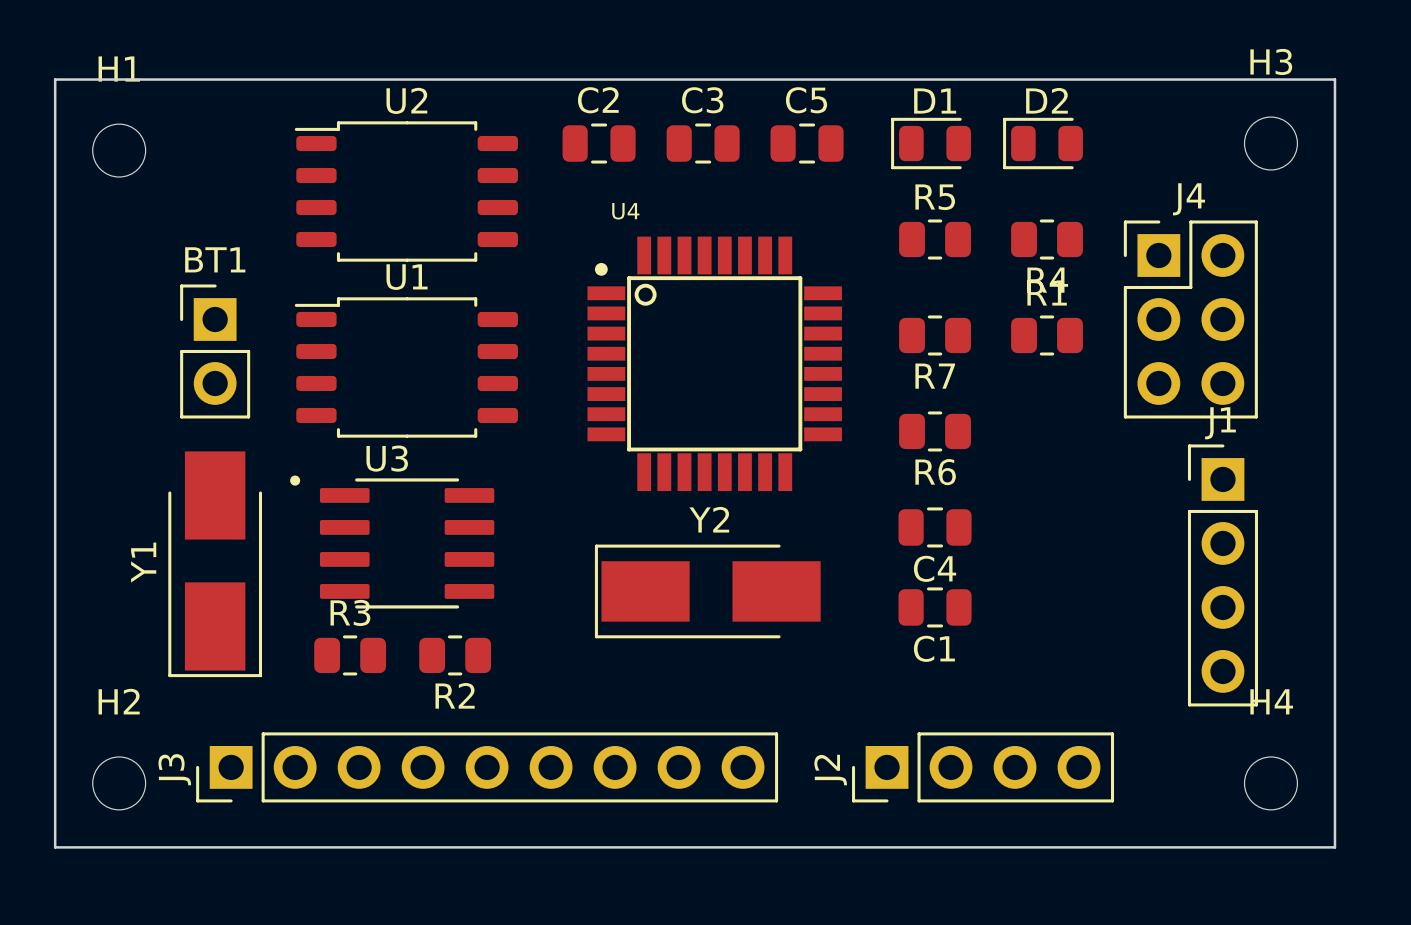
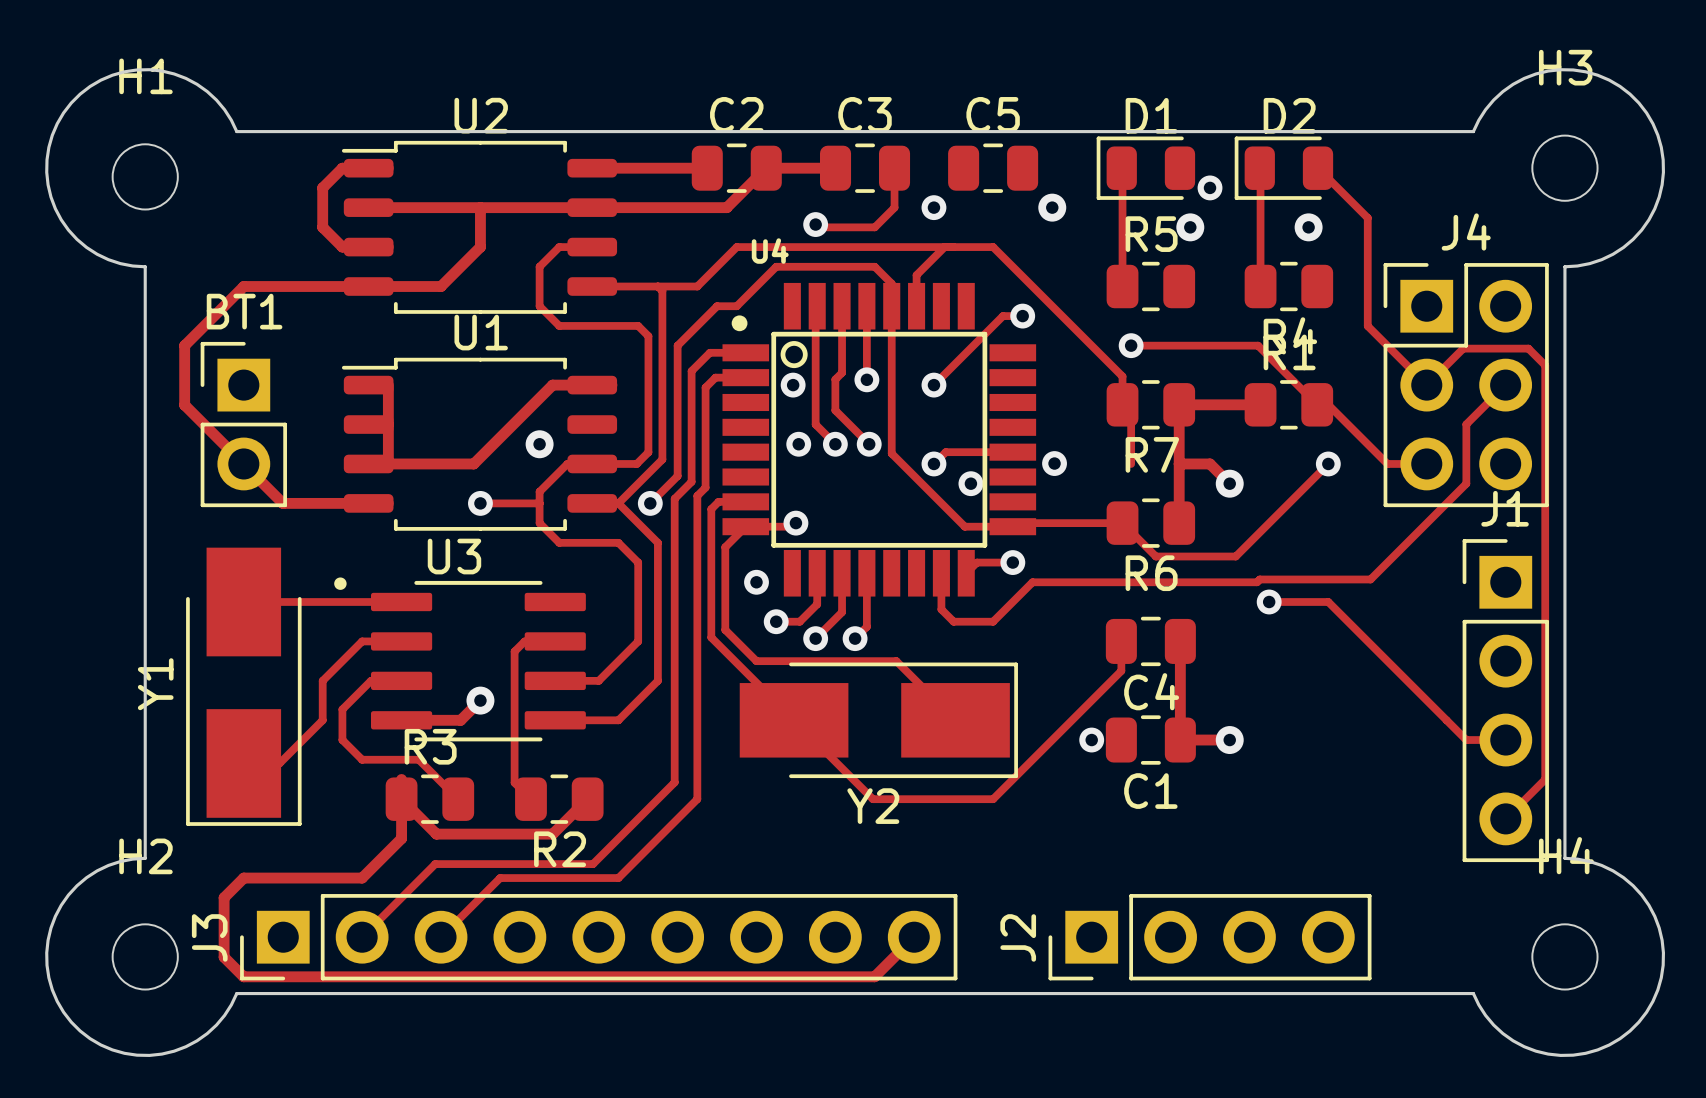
board edge: (55, 79) (1334, 79) (1334, 847) (55, 847) (55, 79) -> (236, 131) (224, 109) (216, 100) (197, 84) (174, 73) (149, 69) (136, 69) (124, 71) (100, 80) (80, 94) (63, 112) (52, 135) (48, 147) (46, 172) (48, 184) (55, 208) (68, 230) (86, 247) (108, 259) (132, 265) (145, 266) (145, 858) (132, 859) (108, 865) (97, 870) (77, 885) (68, 895) (55, 916) (48, 940) (46, 952) (48, 977) (57, 1001) (71, 1022) (90, 1038) (112, 1049) (136, 1055) (149, 1055) (174, 1051) (185, 1046) (207, 1033) (224, 1015) (236, 993) (1473, 993) (1485, 1015) (1502, 1033) (1524, 1046) (1535, 1051) (1560, 1055) (1585, 1053) (1609, 1045) (1630, 1030) (1646, 1012) (1657, 989) (1663, 965) (1662, 940) (1654, 916) (1641, 895) (1623, 877) (1601, 865) (1589, 861) (1564, 858) (1564, 266) (1589, 263) (1601, 259) (1613, 254) (1633, 239) (1641, 230) (1654, 208) (1662, 184) (1663, 172) (1661, 147) (1652, 123) (1638, 103) (1620, 86) (1597, 75) (1573, 69) (1548, 71) (1535, 73) (1524, 78) (1502, 91) (1485, 109) (1473, 131) (236, 131)
track: none -> (388, 168) (342, 168) (322, 187) (322, 227) (342, 247) (388, 247)
track: none -> (611, 168) (707, 168)
track: none -> (835, 168) (766, 168) (726, 207) (388, 207)
track: none -> (894, 168) (894, 207) (874, 227) (818, 227) (815, 224)
track: none -> (1121, 168) (1122, 286)
track: none -> (1259, 168) (1260, 286)
track: none -> (1318, 168) (1367, 217) (1367, 326) (1426, 385) (1463, 348) (1528, 348) (1545, 365) (1545, 779) (1505, 818)
via: none -> (1210, 187)
track: none -> (480, 207) (480, 247) (441, 286) (243, 286) (184, 345) (184, 405) (282, 503) (388, 503)
via: none -> (933, 207)
via: none -> (1052, 207)
via: none -> (815, 224)
U2 position: (406, 191) -> (479, 227)
via: none -> (1190, 227)
via: none -> (1308, 227)
track: none -> (611, 247) (559, 247) (539, 266) (539, 306) (559, 325) (638, 325) (648, 336) (648, 452) (636, 463) (567, 463) (539, 491) (539, 523) (559, 542) (618, 542) (638, 562) (638, 641) (598, 680) (577, 680)
track: none -> (944, 247) (916, 275) (916, 306)
track: none -> (611, 286) (697, 286) (736, 247) (993, 247) (1122, 376) (1122, 404) (1131, 413) (1131, 463)
track: none -> (657, 286) (662, 291) (662, 459) (618, 503) (657, 542) (657, 680) (618, 720) (577, 720)
track: none -> (817, 306) (815, 307) (815, 424) (835, 444)
track: none -> (842, 306) (842, 372) (835, 379) (835, 410) (869, 444)
track: none -> (866, 306) (866, 379)
track: none -> (1022, 316) (1002, 316) (933, 385)
via: none -> (1022, 316)
track: none -> (1131, 345) (1258, 345) (1317, 404) (1328, 404) (1387, 463) (1426, 463)
via: none -> (1131, 345)
track: none -> (745, 352) (709, 352) (691, 371) (691, 481) (674, 498) (674, 782) (593, 864) (435, 864) (362, 937)
track: none -> (745, 377) (715, 377) (705, 387) (705, 487) (697, 495) (697, 799) (618, 878) (500, 878) (441, 937)
via: none -> (866, 379)
track: none -> (388, 385) (388, 463) (473, 463) (552, 385) (611, 385)
via: none -> (793, 385)
via: none -> (933, 385)
track: none -> (1505, 385) (1466, 424) (1466, 483) (1370, 579) (1259, 579) (1257, 582) (1032, 582) (993, 621) (953, 621) (941, 609) (941, 573)
track: none -> (1260, 404) (1179, 404) (1179, 523)
BT1 position: (215, 351) -> (243, 424)
U1 position: (406, 367) -> (479, 444)
via: none -> (539, 444)
via: none -> (798, 444)
via: none -> (835, 444)
via: none -> (869, 444)
track: none -> (1012, 452) (945, 452) (933, 463)
via: none -> (933, 463)
via: none -> (1054, 463)
track: none -> (1179, 463) (1210, 463) (1229, 483)
track: none -> (1328, 463) (1235, 556) (1155, 556) (1122, 523) (1016, 523) (1012, 526) (964, 526) (891, 453) (891, 283) (874, 266) (776, 266) (736, 306) (717, 306) (677, 345) (677, 476) (650, 503)
via: none -> (1328, 463)
via: none -> (970, 483)
via: none -> (1229, 483)
track: none -> (745, 501) (718, 501) (711, 509) (711, 637) (872, 799) (993, 799) (1121, 670) (1121, 641)
track: none -> (480, 503) (539, 503)
via: none -> (480, 503)
via: none -> (650, 503)
track: none -> (795, 523) (792, 526) (745, 526) (725, 547) (725, 629) (756, 661) (896, 661) (955, 720)
via: none -> (795, 523)
track: none -> (1012, 562) (976, 562) (966, 573)
via: none -> (1012, 562)
track: none -> (817, 573) (817, 604) (799, 621) (776, 621)
track: none -> (842, 573) (842, 612) (815, 638)
track: none -> (866, 573) (866, 626) (855, 638)
via: none -> (756, 582)
track: none -> (263, 602) (423, 602)
track: none -> (1269, 602) (1328, 602) (1466, 740) (1505, 740)
via: none -> (1269, 602)
via: none -> (776, 621)
via: none -> (815, 638)
via: none -> (855, 638)
track: none -> (423, 641) (362, 641) (322, 680) (322, 720) (279, 763) (263, 763)
track: none -> (555, 641) (524, 641) (514, 651) (514, 782) (530, 799)
track: none -> (1180, 641) (1180, 740) (1229, 740)
U3 position: (392, 542) -> (460, 659)
track: none -> (401, 680) (370, 680) (342, 709) (342, 740) (362, 759) (418, 759) (458, 799)
Y1 position: (215, 564) -> (243, 686)
track: none -> (480, 700) (460, 720) (423, 720)
via: none -> (480, 700)
Y2 rotation: 0° (707, 591) -> 180° (878, 720)
via: none -> (1091, 740)
via: none -> (1229, 740)
track: none -> (401, 779) (401, 838) (362, 878) (243, 878) (224, 897) (224, 957) (243, 976) (874, 976) (914, 937)
track: none -> (587, 788) (587, 799) (552, 834) (436, 834) (401, 799)

